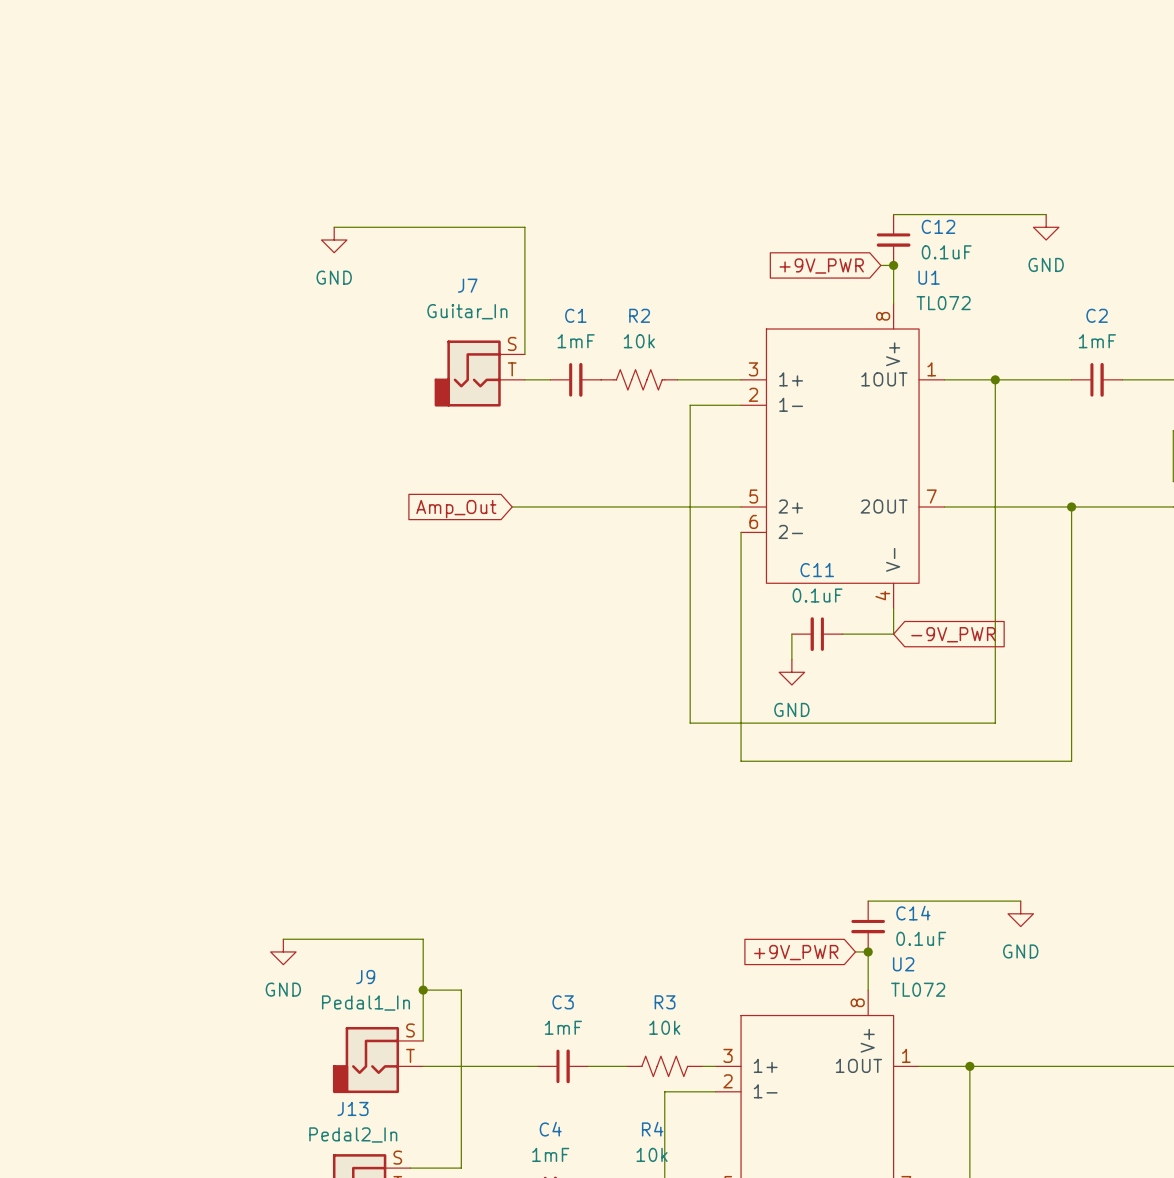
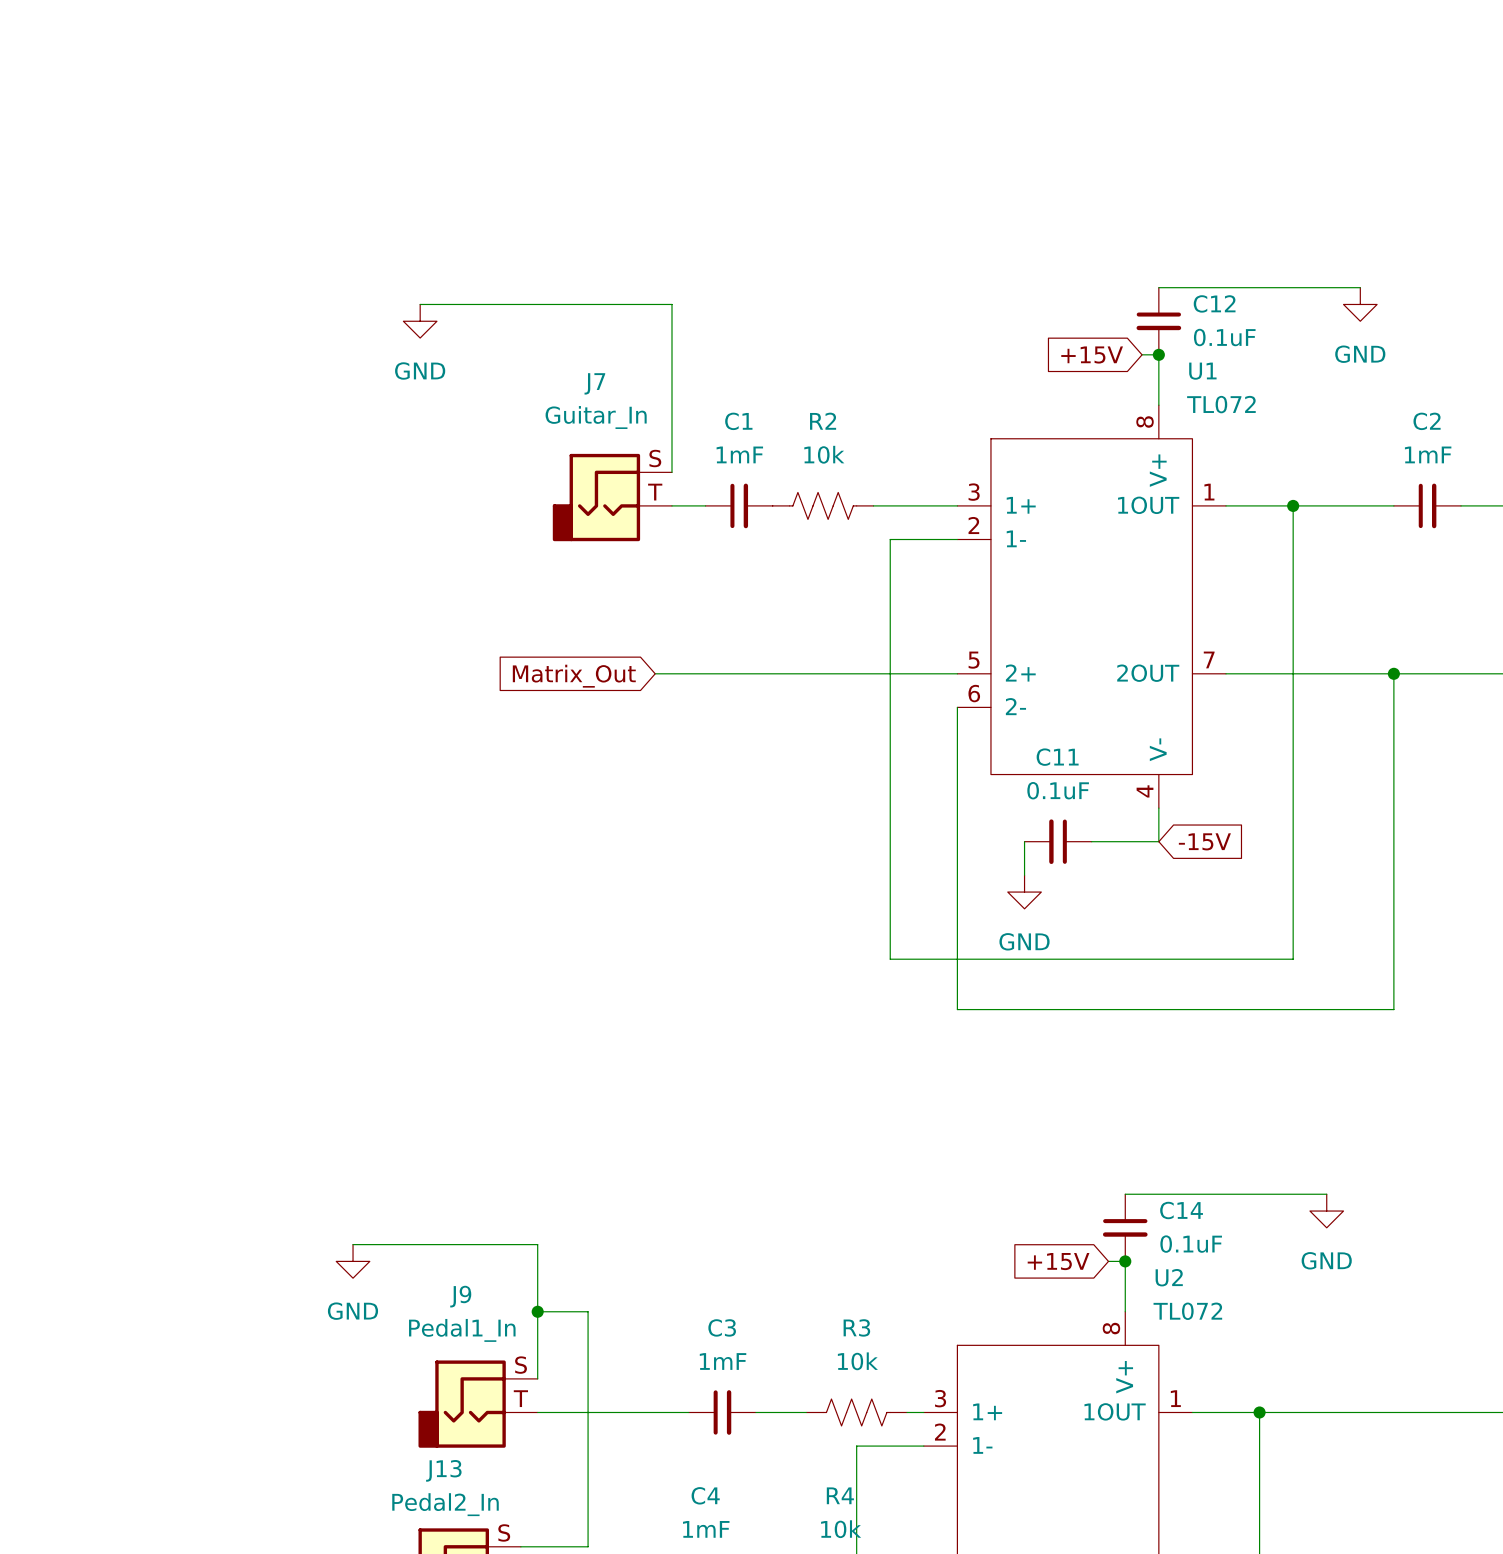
global label: +9V_PWR (821, 266) -> +15V (1092, 355)
global label: Amp_Out (456, 509) -> Matrix_Out (574, 676)
global label: -9V_PWR (953, 634) -> -15V (1204, 841)
global label: +9V_PWR (796, 952) -> +15V (1058, 1261)

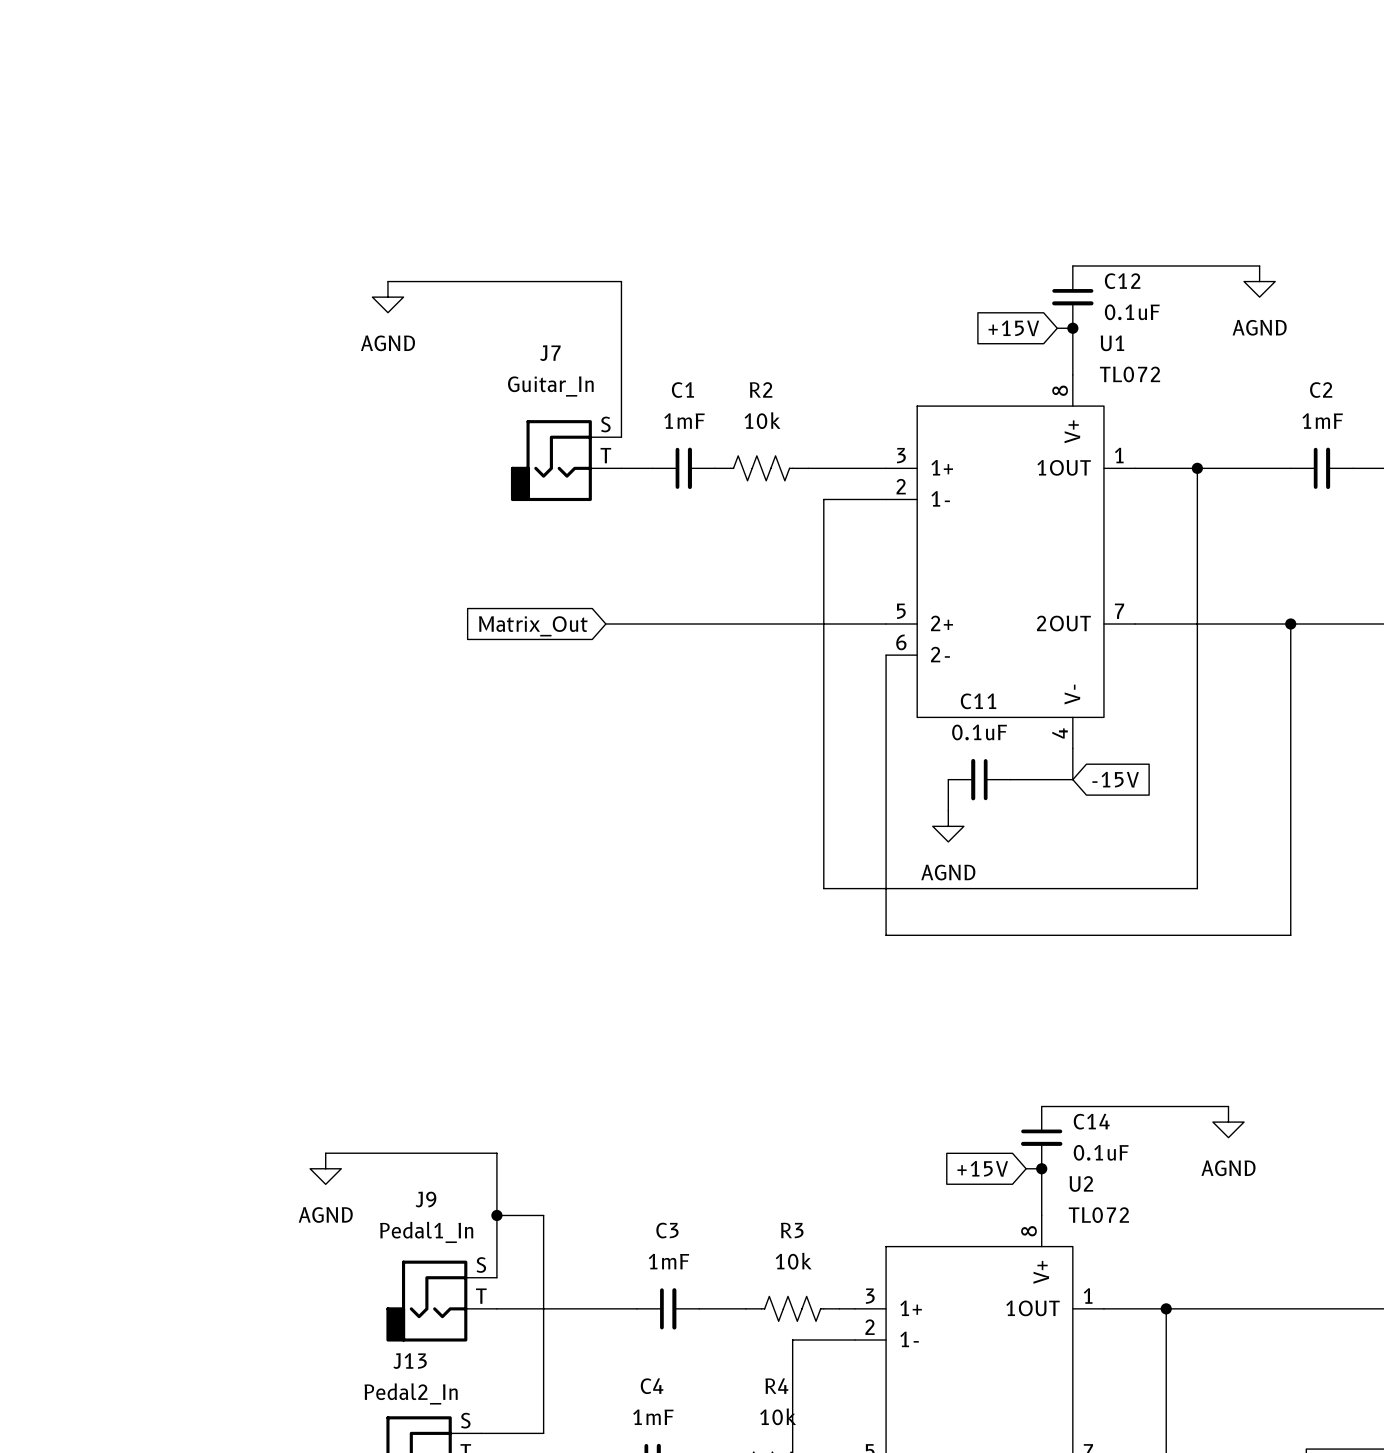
power symbol: GND (1360, 304) -> AGND (1259, 281)
power symbol: GND (420, 321) -> AGND (387, 297)
power symbol: GND (1024, 892) -> AGND (948, 826)
power symbol: GND (1326, 1211) -> AGND (1228, 1122)
power symbol: GND (353, 1261) -> AGND (325, 1168)

